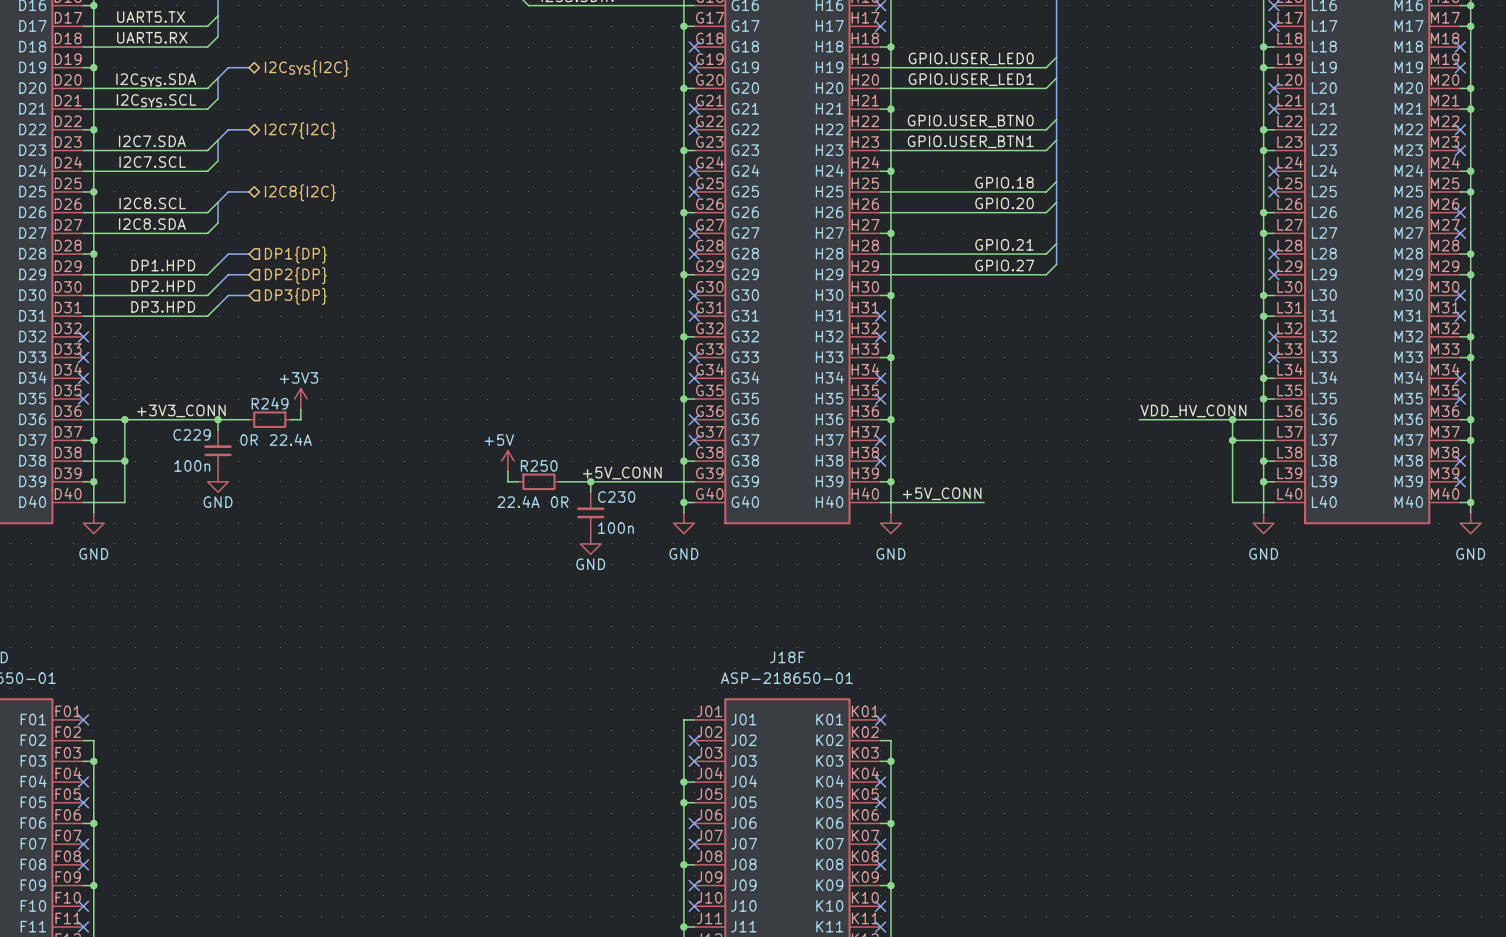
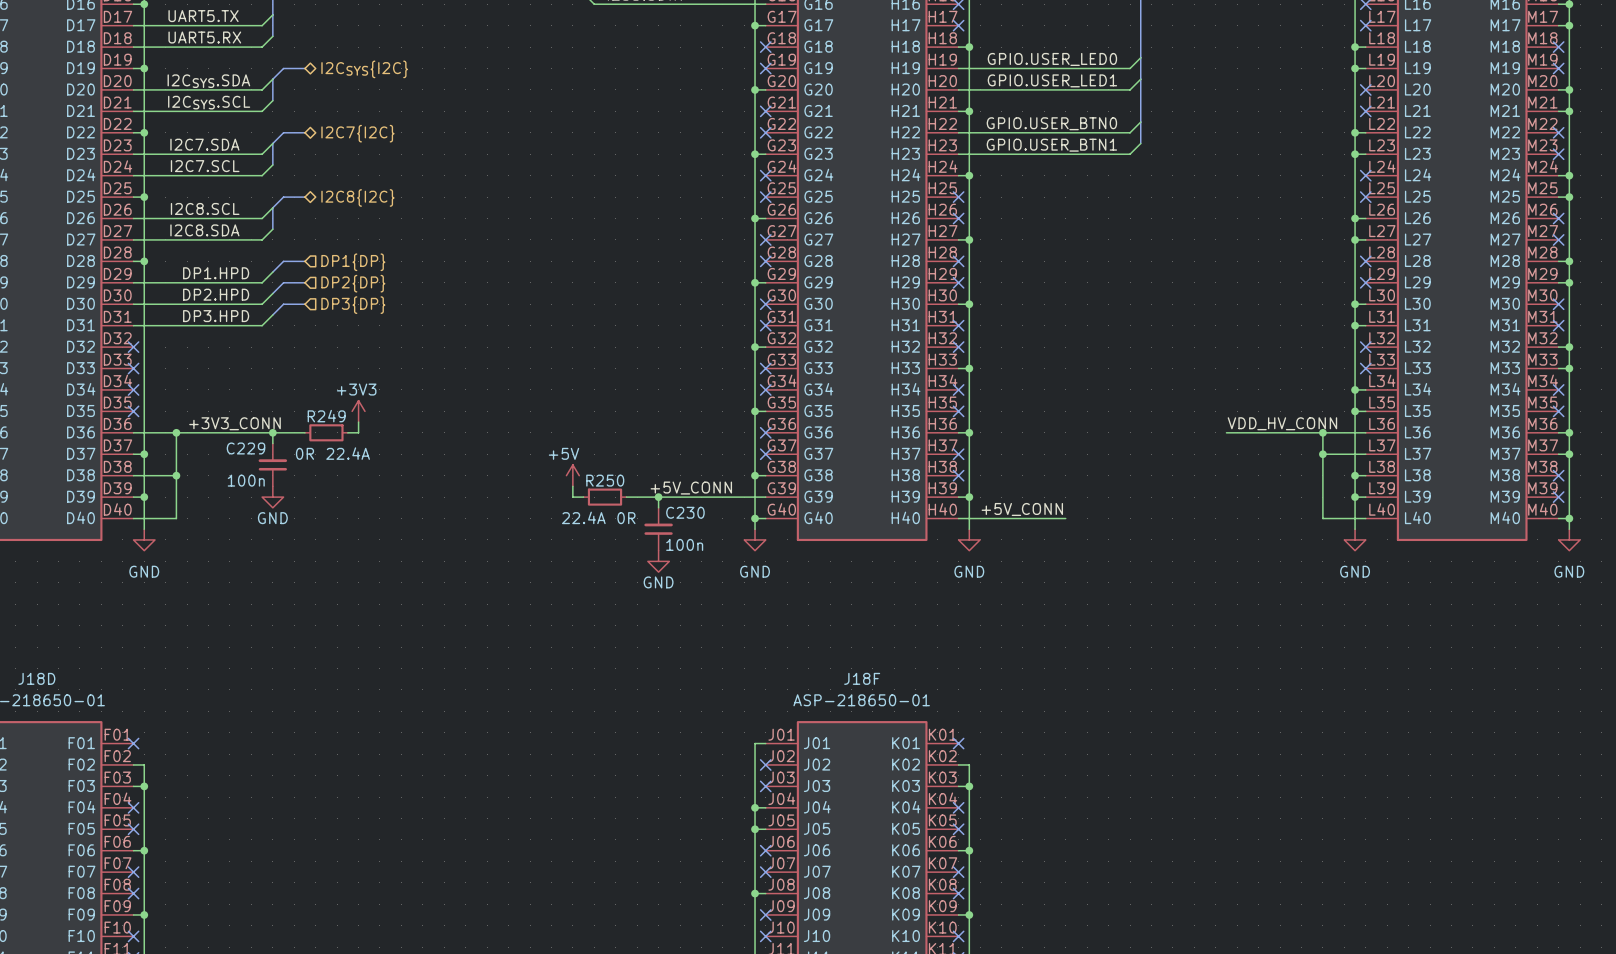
bus: (1056, 140) (1056, 264) -> none
wire: (1056, 181) (1046, 191) (880, 191) -> none
label: GPIO.18 (1004, 182) -> none
no-connect mark: none -> (958, 197)
wire: (1056, 202) (1046, 212) (880, 212) -> none
label: GPIO.20 (1004, 203) -> none
no-connect mark: none -> (958, 218)
wire: (1056, 243) (1046, 254) (880, 254) -> none
label: GPIO.21 (1004, 244) -> none
no-connect mark: none -> (958, 261)
wire: (1056, 264) (1046, 274) (880, 274) -> none
label: GPIO.27 (1004, 265) -> none
no-connect mark: none -> (958, 282)

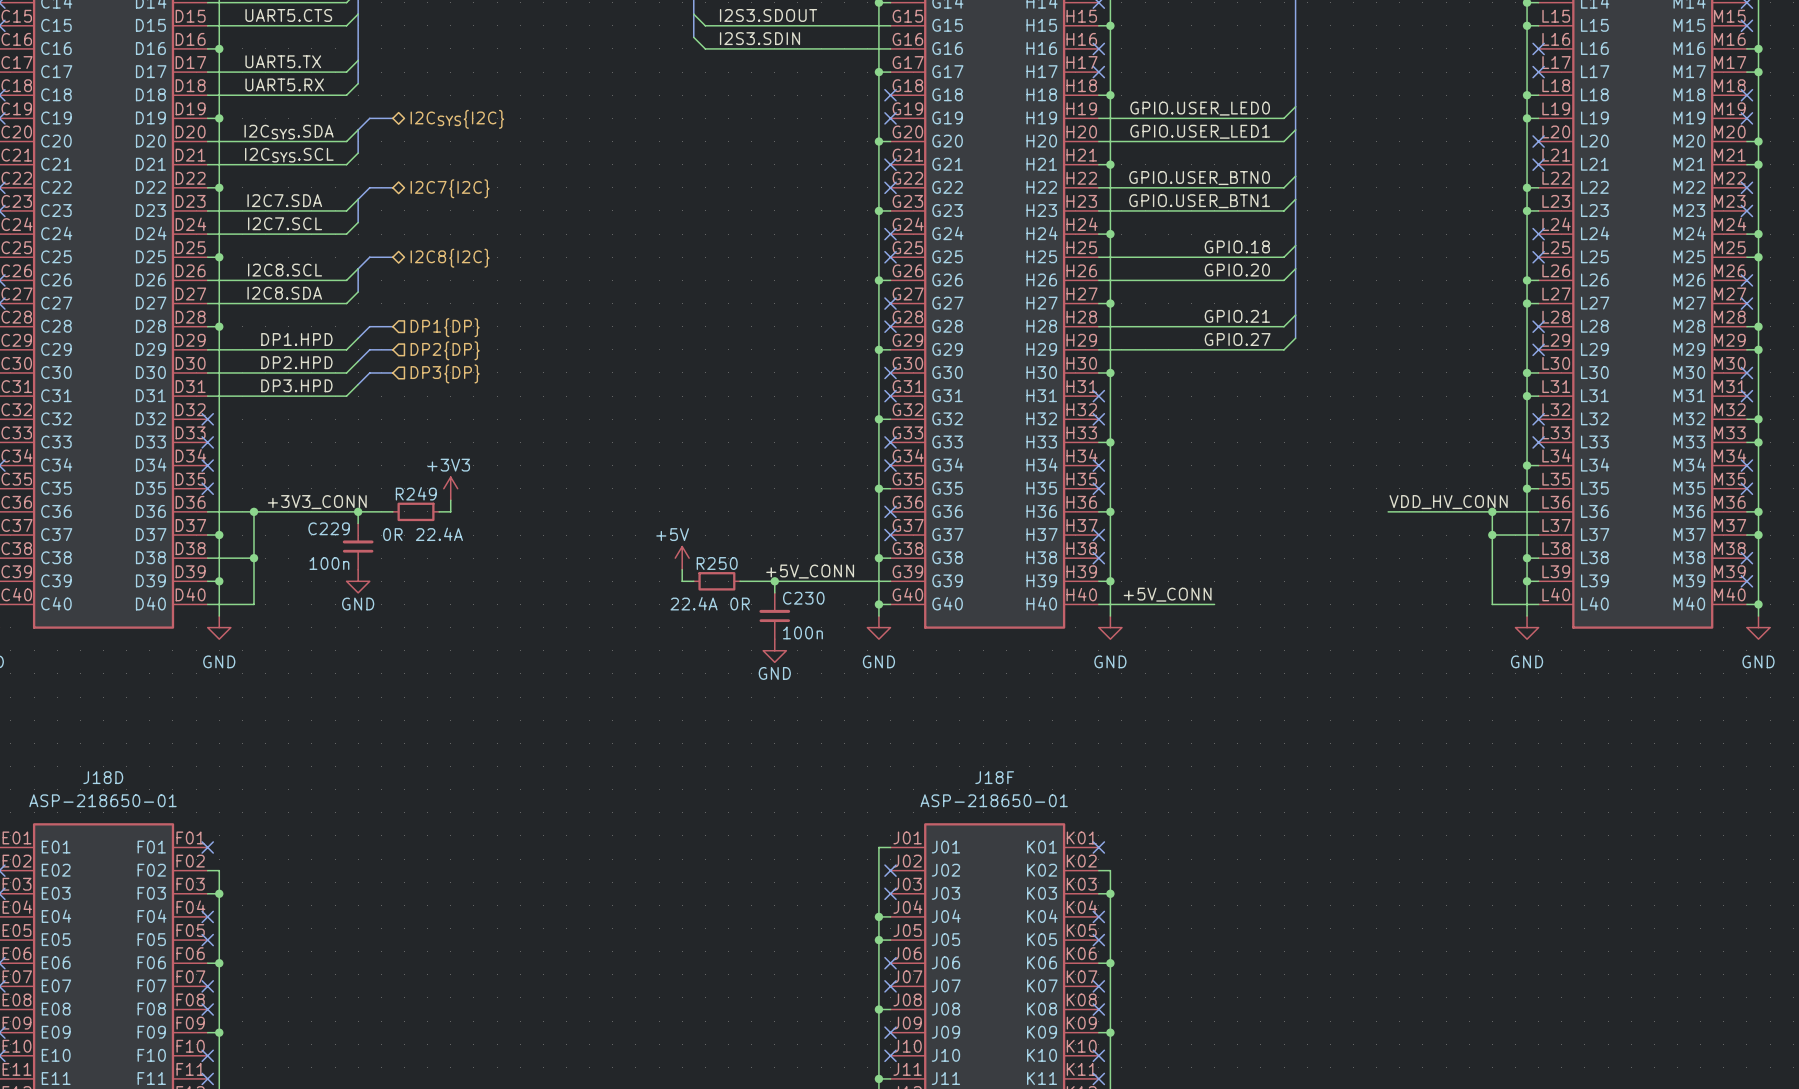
bus: none -> (1295, 199) (1295, 338)
wire: none -> (1295, 245) (1284, 257) (1098, 257)
label: none -> GPIO.18 (1237, 246)
no-connect mark: (958, 197) -> none
wire: none -> (1295, 268) (1284, 280) (1098, 280)
label: none -> GPIO.20 (1237, 270)
no-connect mark: (958, 218) -> none
wire: none -> (1295, 315) (1284, 326) (1098, 326)
label: none -> GPIO.21 (1237, 316)
no-connect mark: (958, 261) -> none
wire: none -> (1295, 338) (1284, 349) (1098, 349)
label: none -> GPIO.27 (1237, 339)
no-connect mark: (958, 282) -> none

